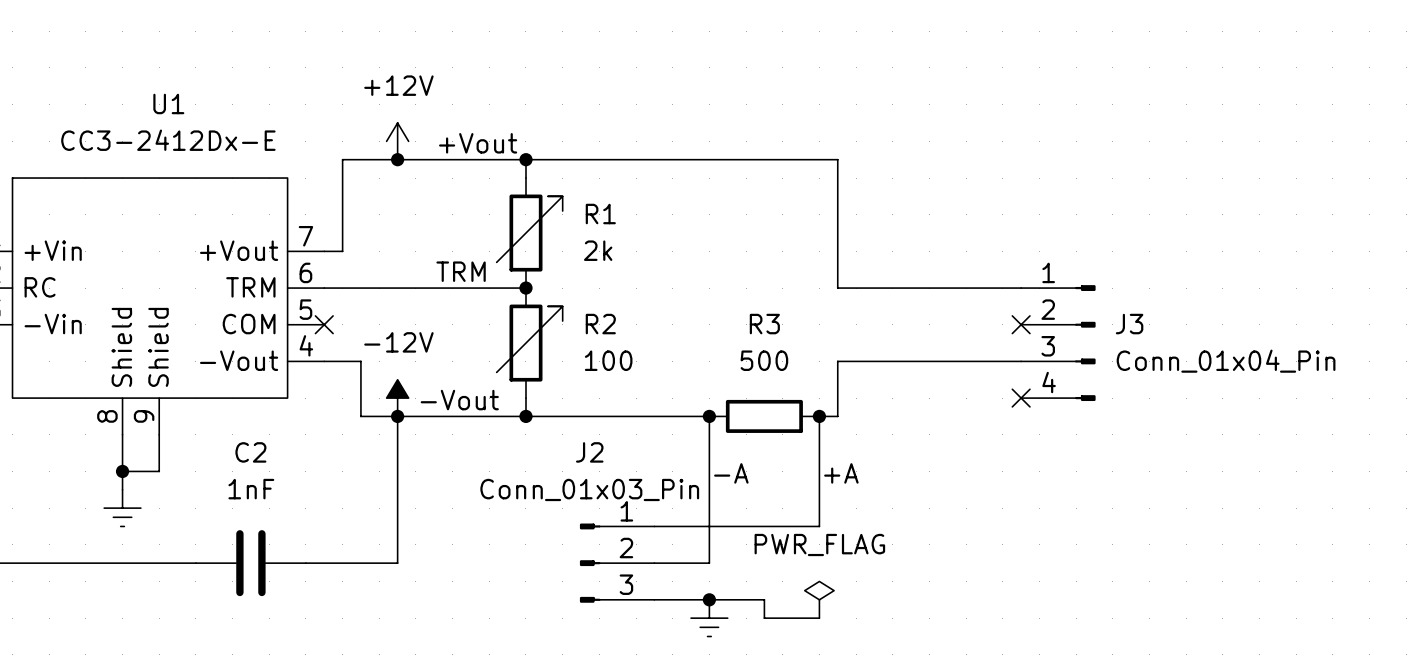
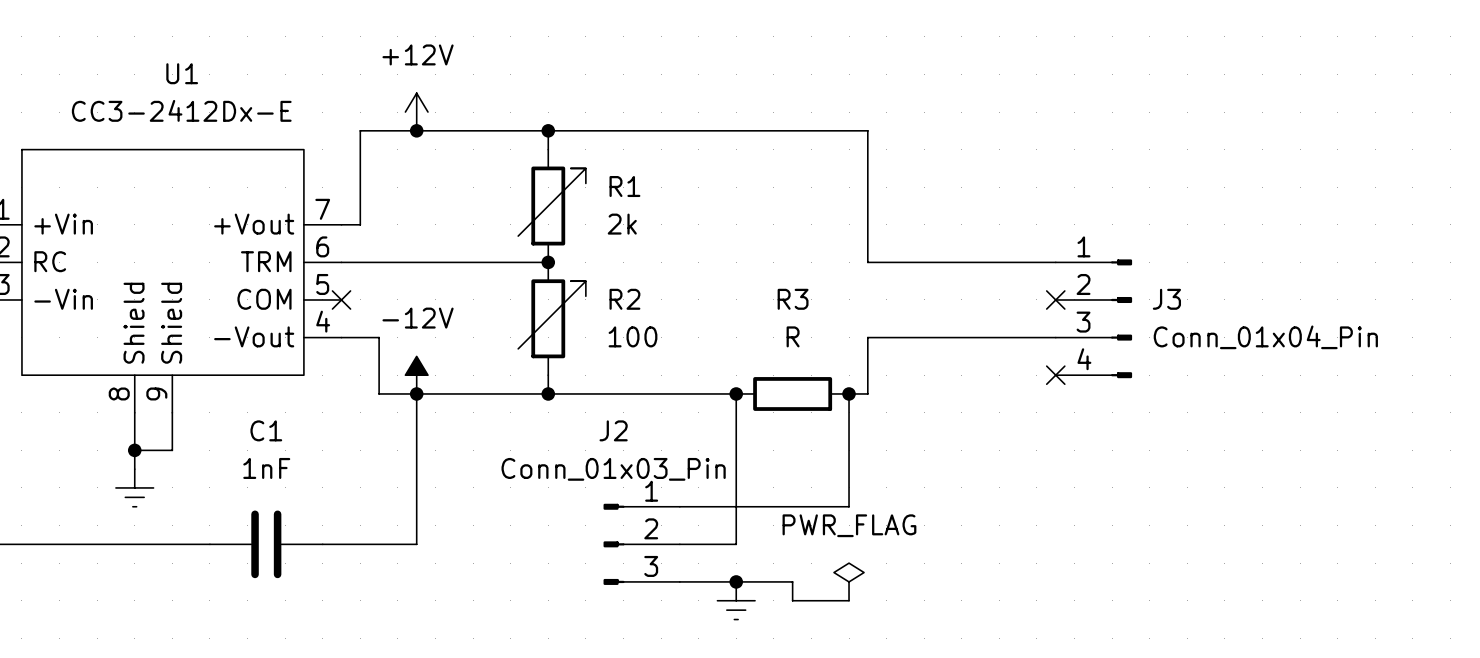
label: +Vout (478, 143) -> none
label: TRM (461, 271) -> none
R3 value: 500 (764, 360) -> R (793, 336)
label: -Vout (459, 400) -> none
C2 name: C2 (250, 452) -> C1 (266, 430)
label: -A (731, 473) -> none
label: +A (841, 473) -> none

